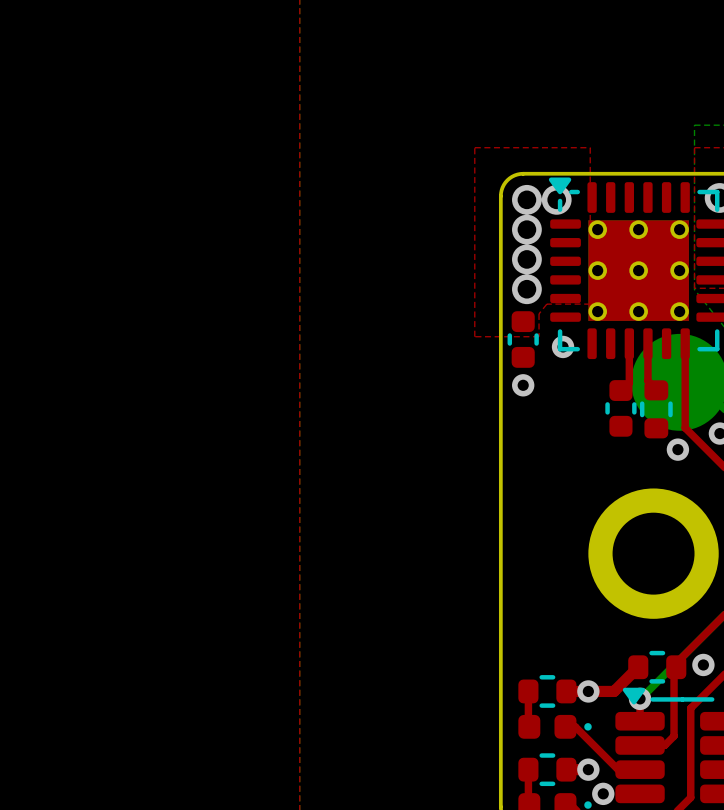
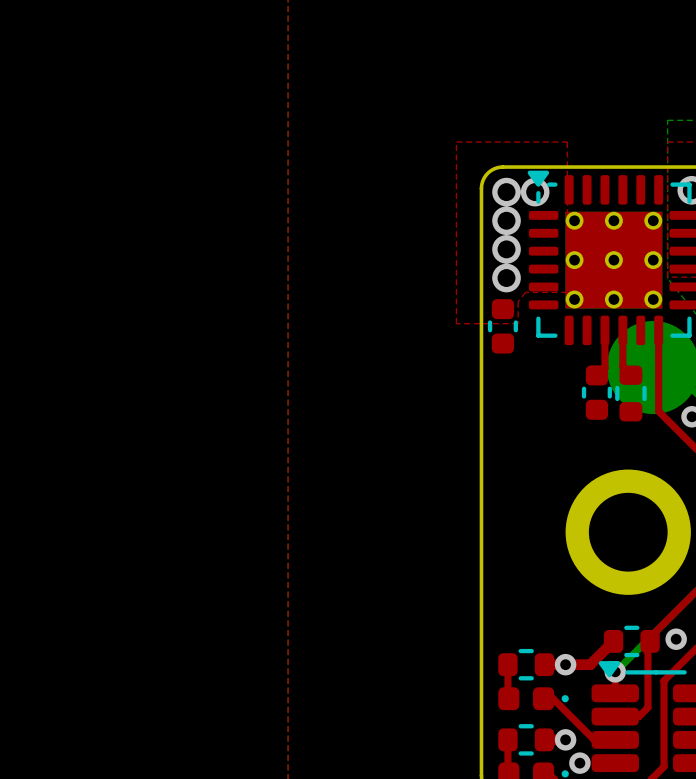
via: (563, 346) -> none
via: (523, 385) -> none
via: (677, 449) -> none

